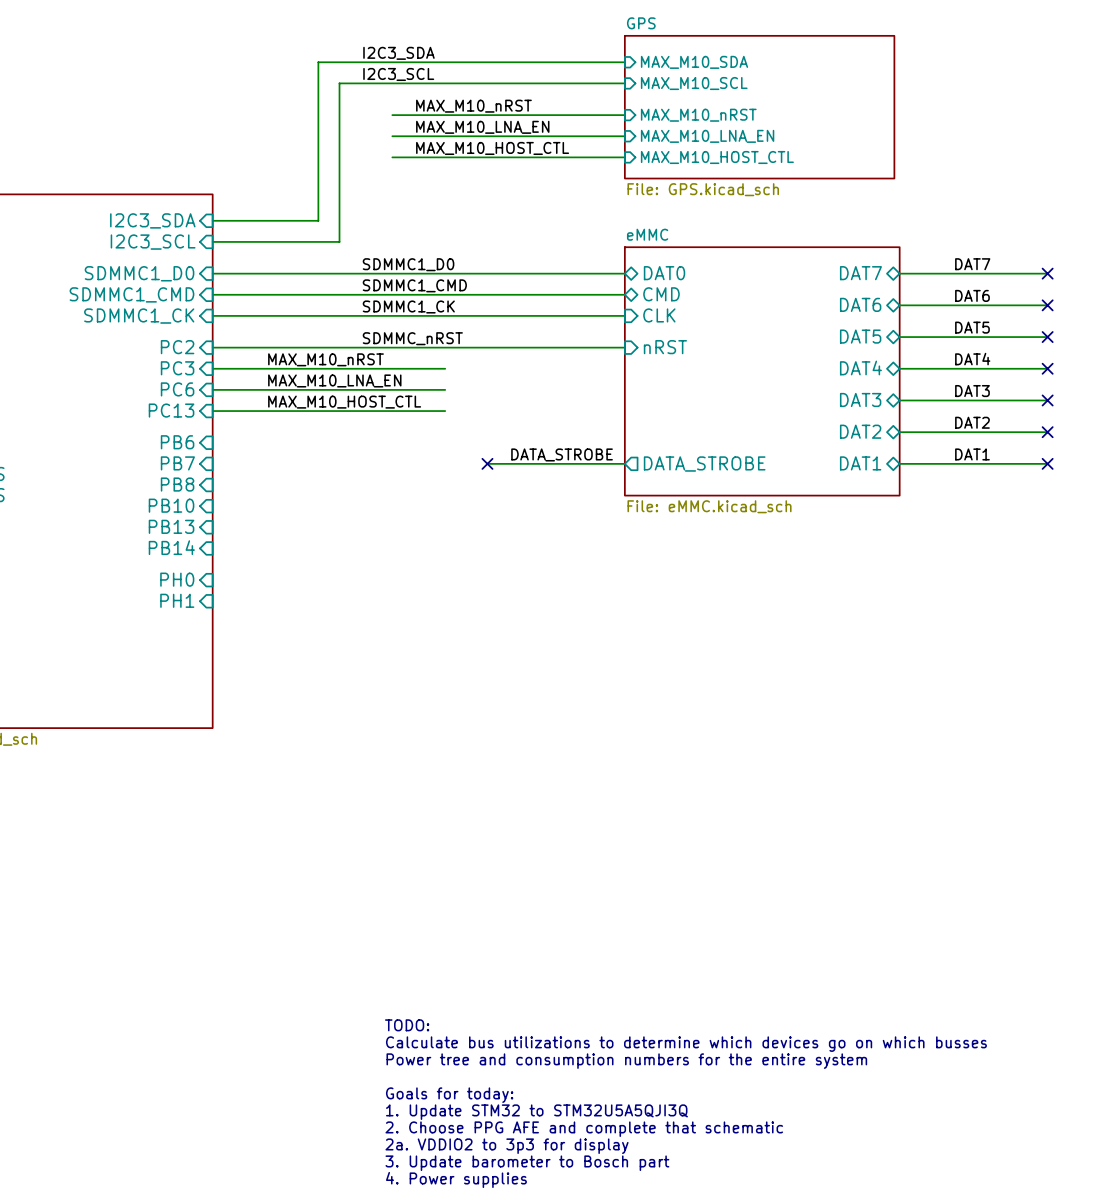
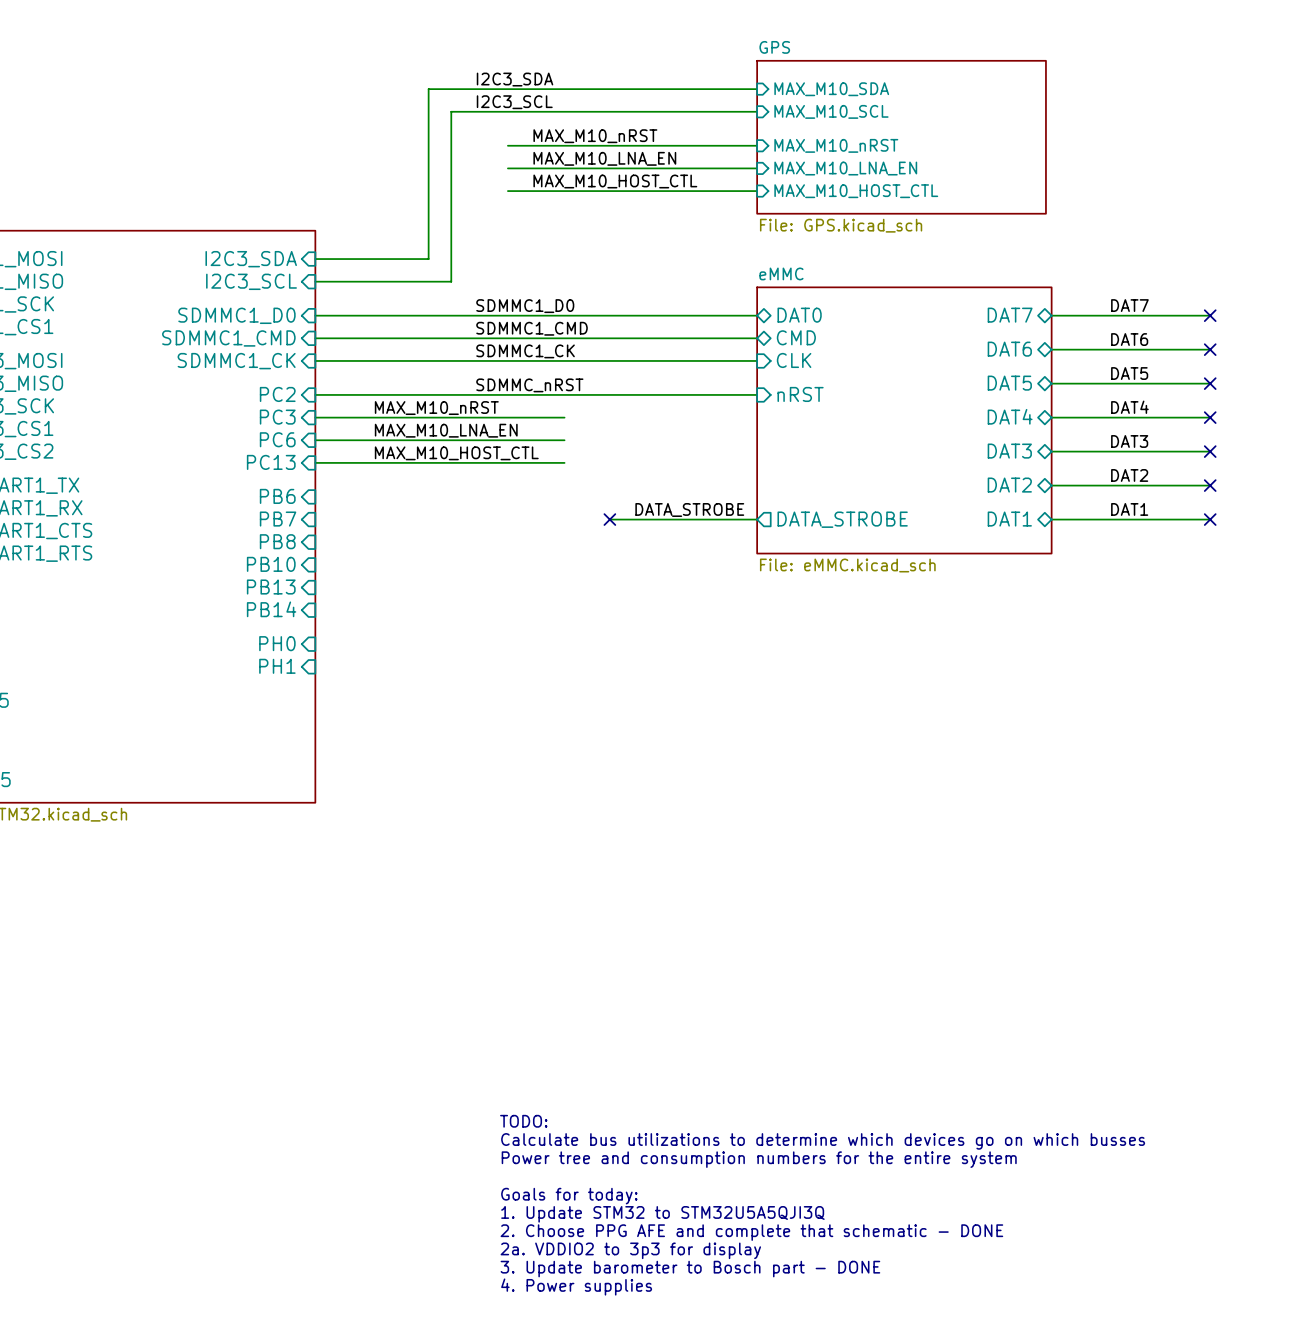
text: 2. Choose PPG AFE and complete that schematic (584, 1129) -> 2. Choose PPG AFE and complete that schematic - DONE (751, 1232)
text: 3. Update barometer to Bosch part (527, 1163) -> 3. Update barometer to Bosch part - DONE (690, 1269)

